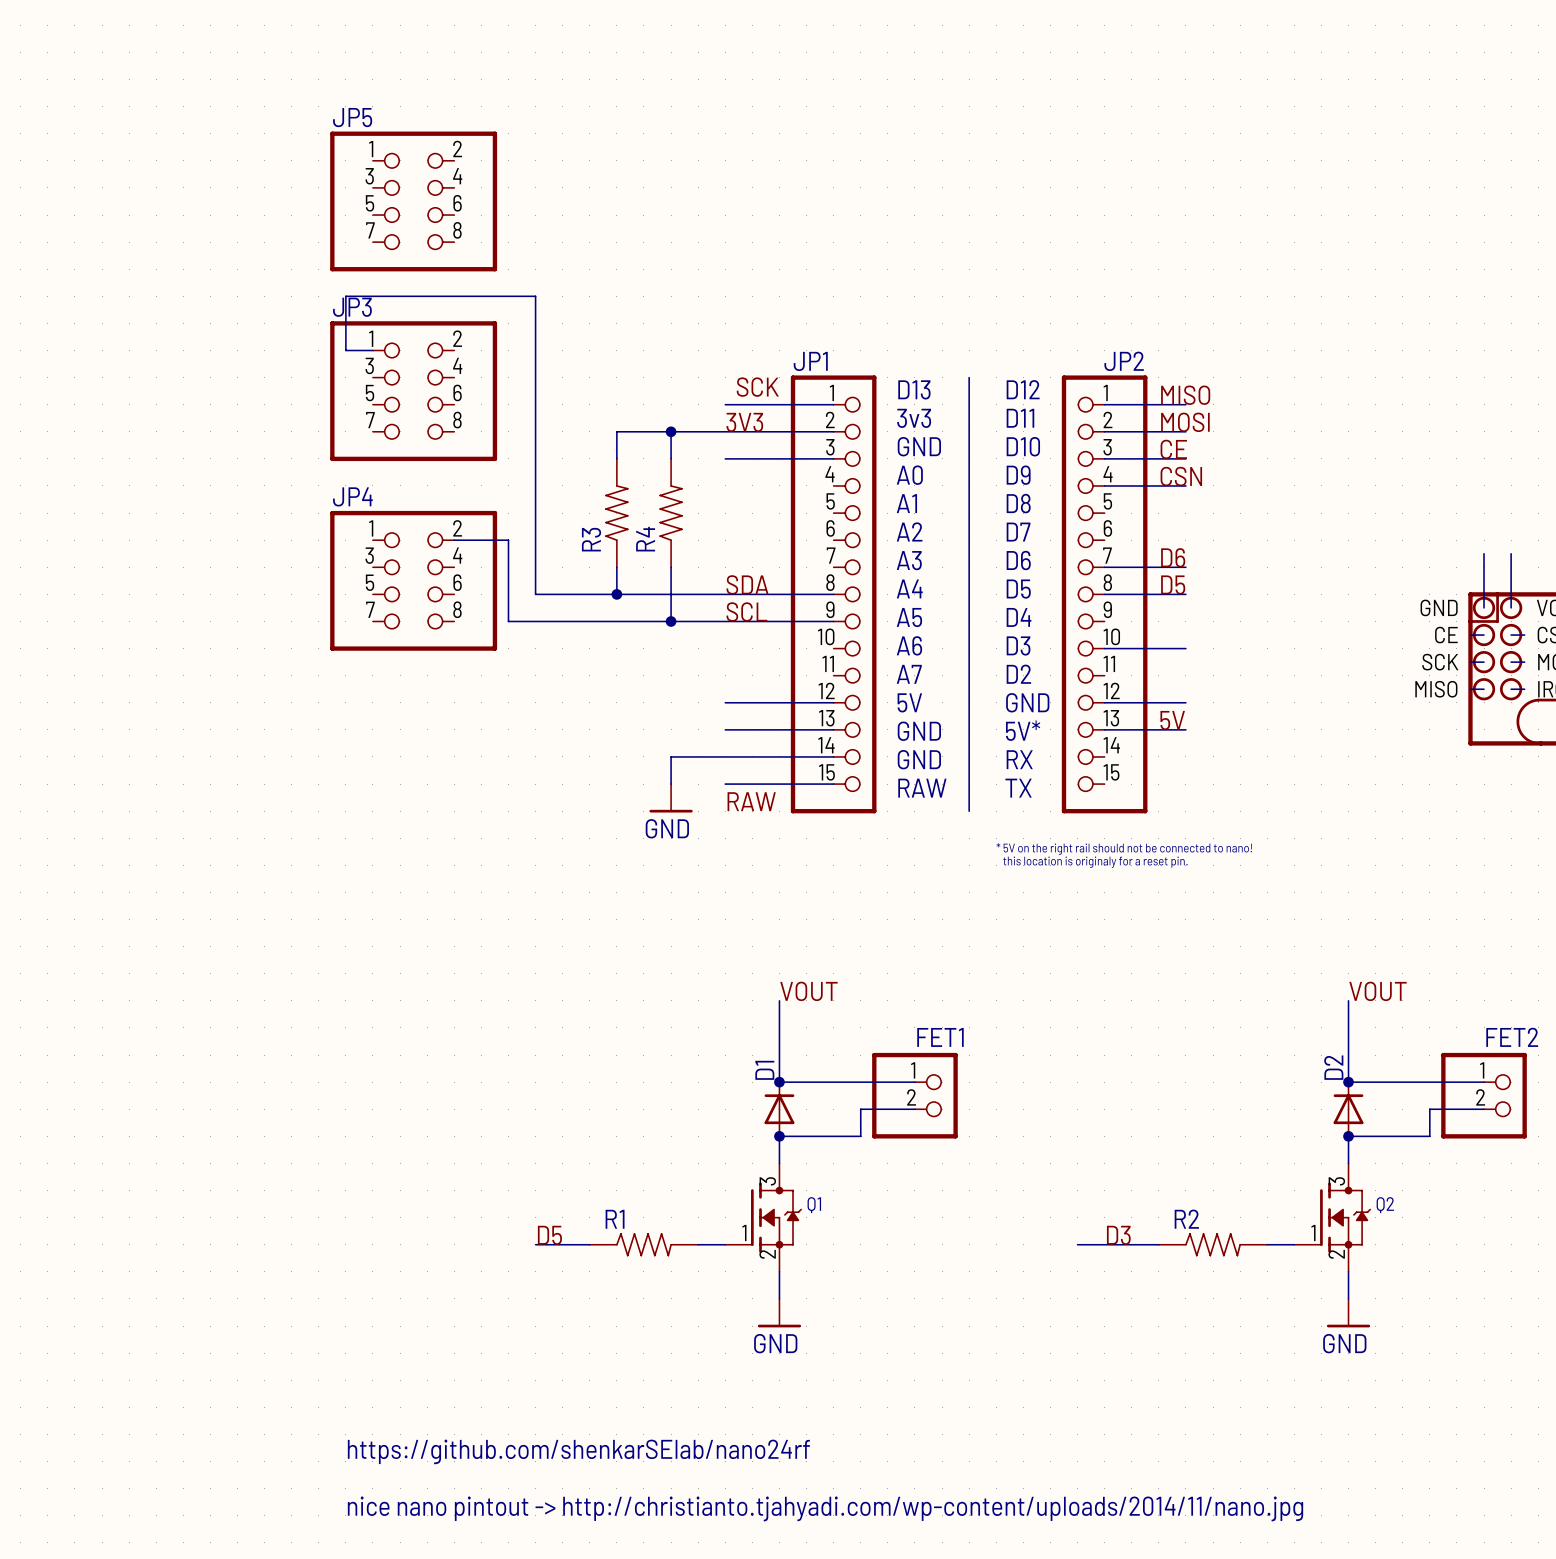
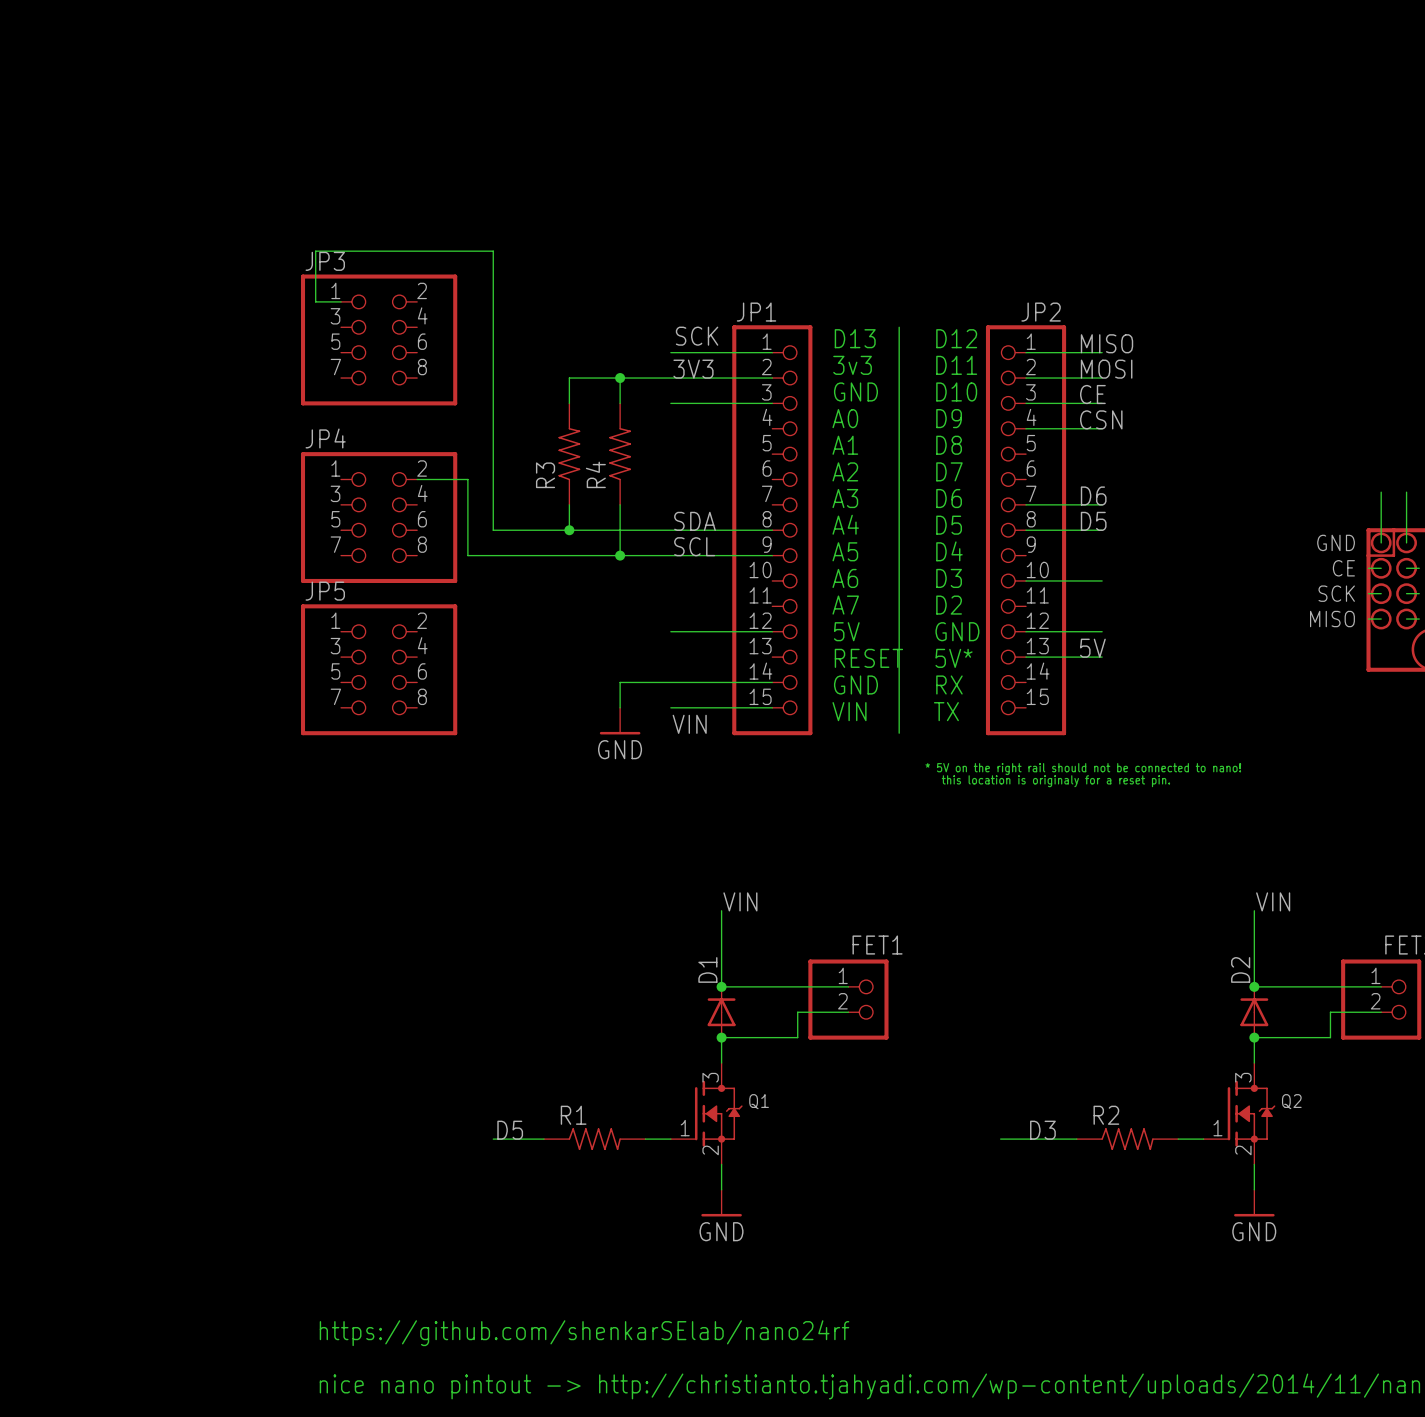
JP5 position: (413, 201) -> (379, 669)
wire: (725, 729) (833, 729) -> none
text: GND (919, 731) -> RESET (868, 658)
text: RAW (922, 788) -> VIN (849, 711)
label: RAW (751, 801) -> VIN (689, 724)
label: VOUT (808, 991) -> VIN (740, 901)
label: VOUT (1378, 991) -> VIN (1273, 901)

